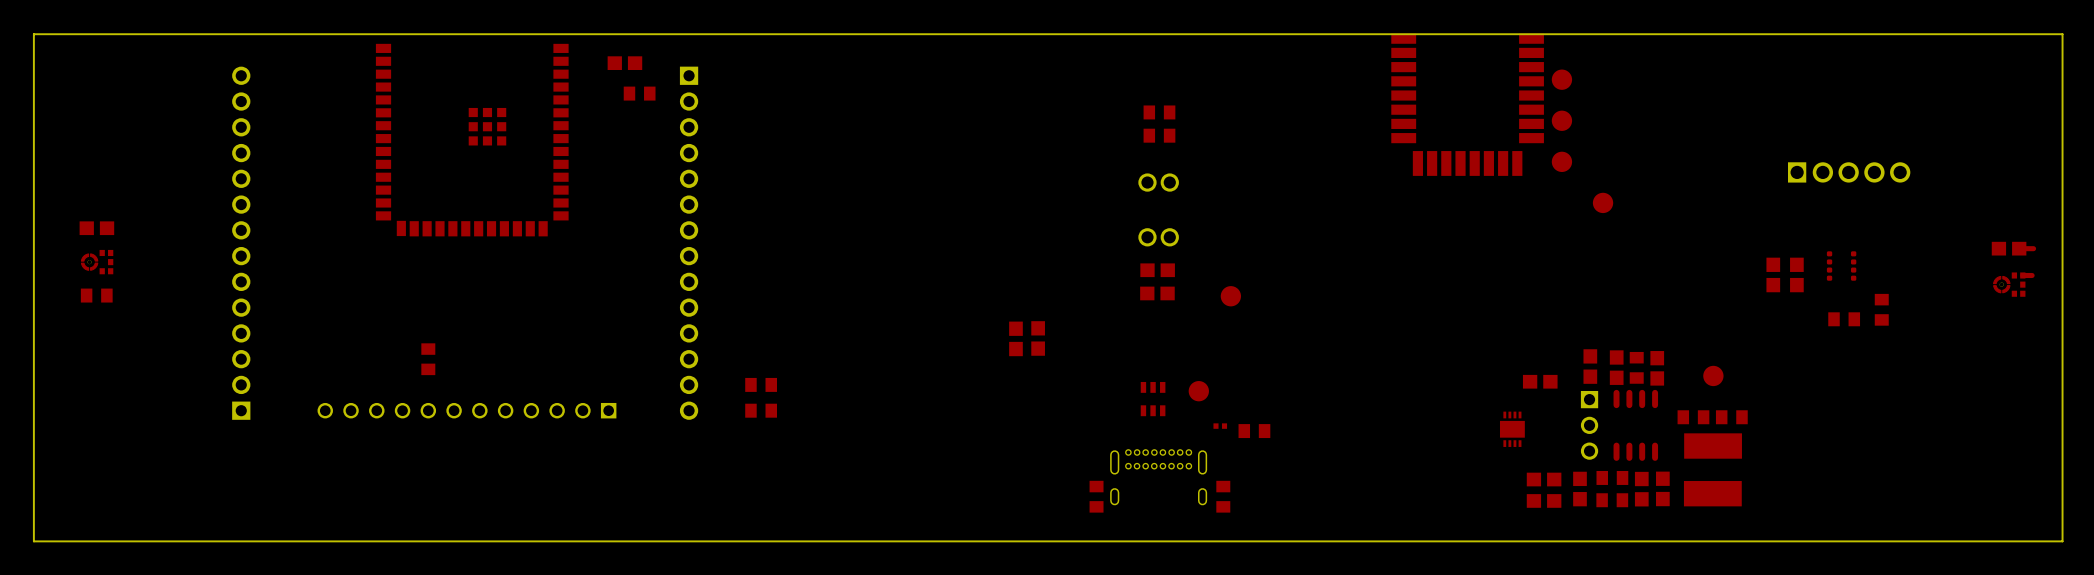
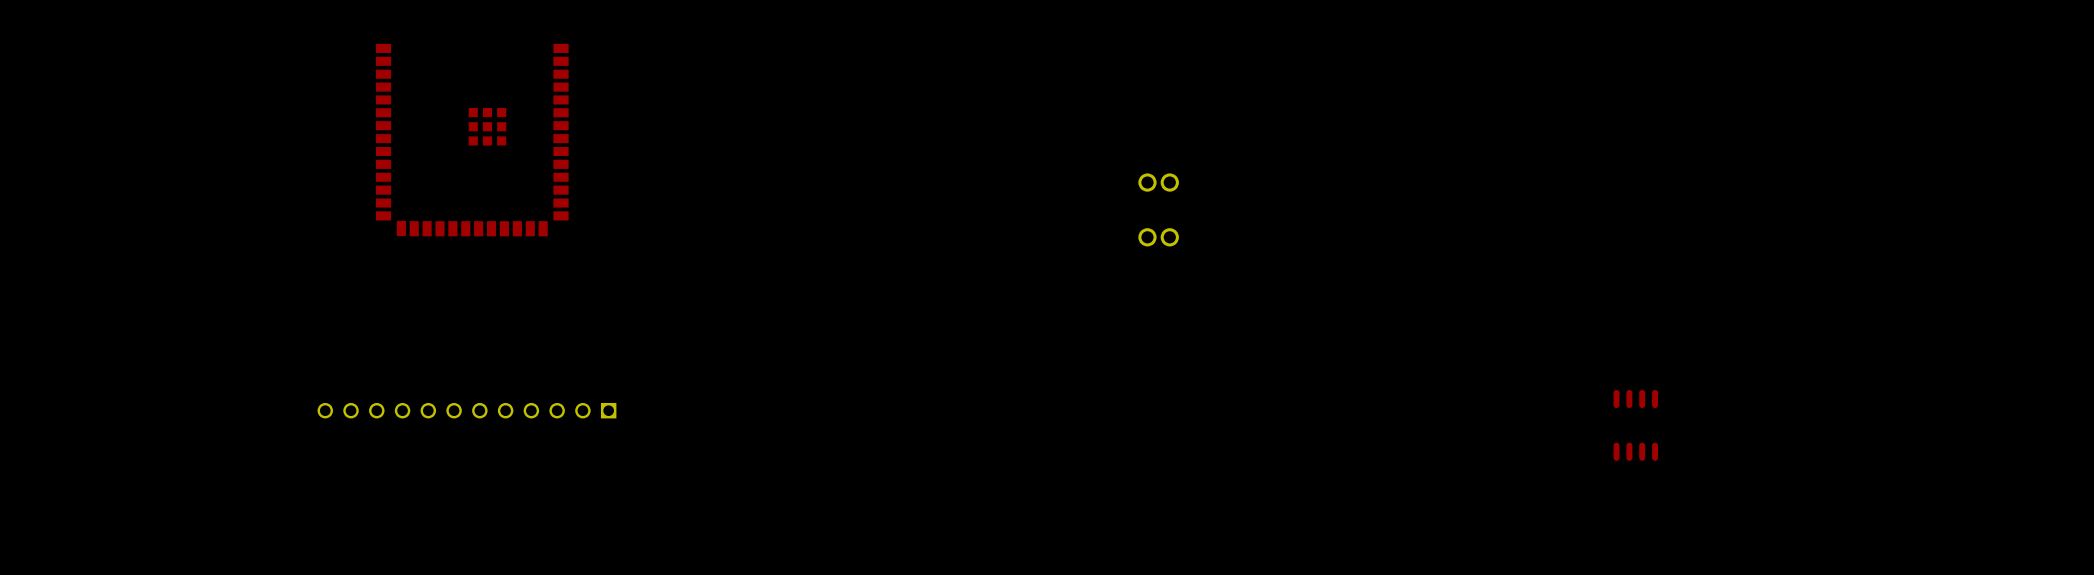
board edge: (2062, 34) (33, 34) (33, 541) (2062, 541) (2062, 34) -> none
part: (624, 63) -> none
part: (1561, 79) -> none
part: (639, 93) -> none
part: (1467, 104) -> none
part: (1159, 112) -> none
part: (1561, 120) -> none
part: (1159, 135) -> none
part: (1561, 161) -> none
part: (1849, 172) -> none
part: (1603, 202) -> none
part: (96, 228) -> none
part: (241, 243) -> none
part: (689, 243) -> none
part: (2009, 248) -> none
top track: (2033, 248) (2019, 248) (2022, 252) -> none
part: (97, 262) -> none
part: (1841, 266) -> none
part: (1157, 270) -> none
part: (1773, 274) -> none
part: (1796, 274) -> none
top track: (2032, 275) (2022, 275) -> none
part: (2009, 284) -> none
part: (1157, 293) -> none
part: (96, 295) -> none
part: (1230, 296) -> none
part: (1881, 309) -> none
part: (1844, 319) -> none
part: (1015, 338) -> none
part: (1038, 338) -> none
part: (428, 359) -> none
part: (1590, 366) -> none
part: (1616, 367) -> none
part: (1636, 367) -> none
part: (1657, 368) -> none
part: (1713, 375) -> none
part: (1540, 381) -> none
part: (761, 384) -> none
part: (1198, 391) -> none
part: (1153, 399) -> none
part: (761, 410) -> none
part: (1693, 417) -> none
part: (1731, 417) -> none
part: (1589, 425) -> none
part: (1220, 426) -> none
part: (1512, 429) -> none
part: (1254, 431) -> none
part: (1712, 469) -> none
part: (1158, 477) -> none
part: (1612, 477) -> none
part: (1544, 479) -> none
part: (1662, 488) -> none
part: (1579, 489) -> none
part: (1641, 489) -> none
part: (1096, 496) -> none
part: (1223, 496) -> none
part: (1544, 500) -> none
part: (1612, 500) -> none

